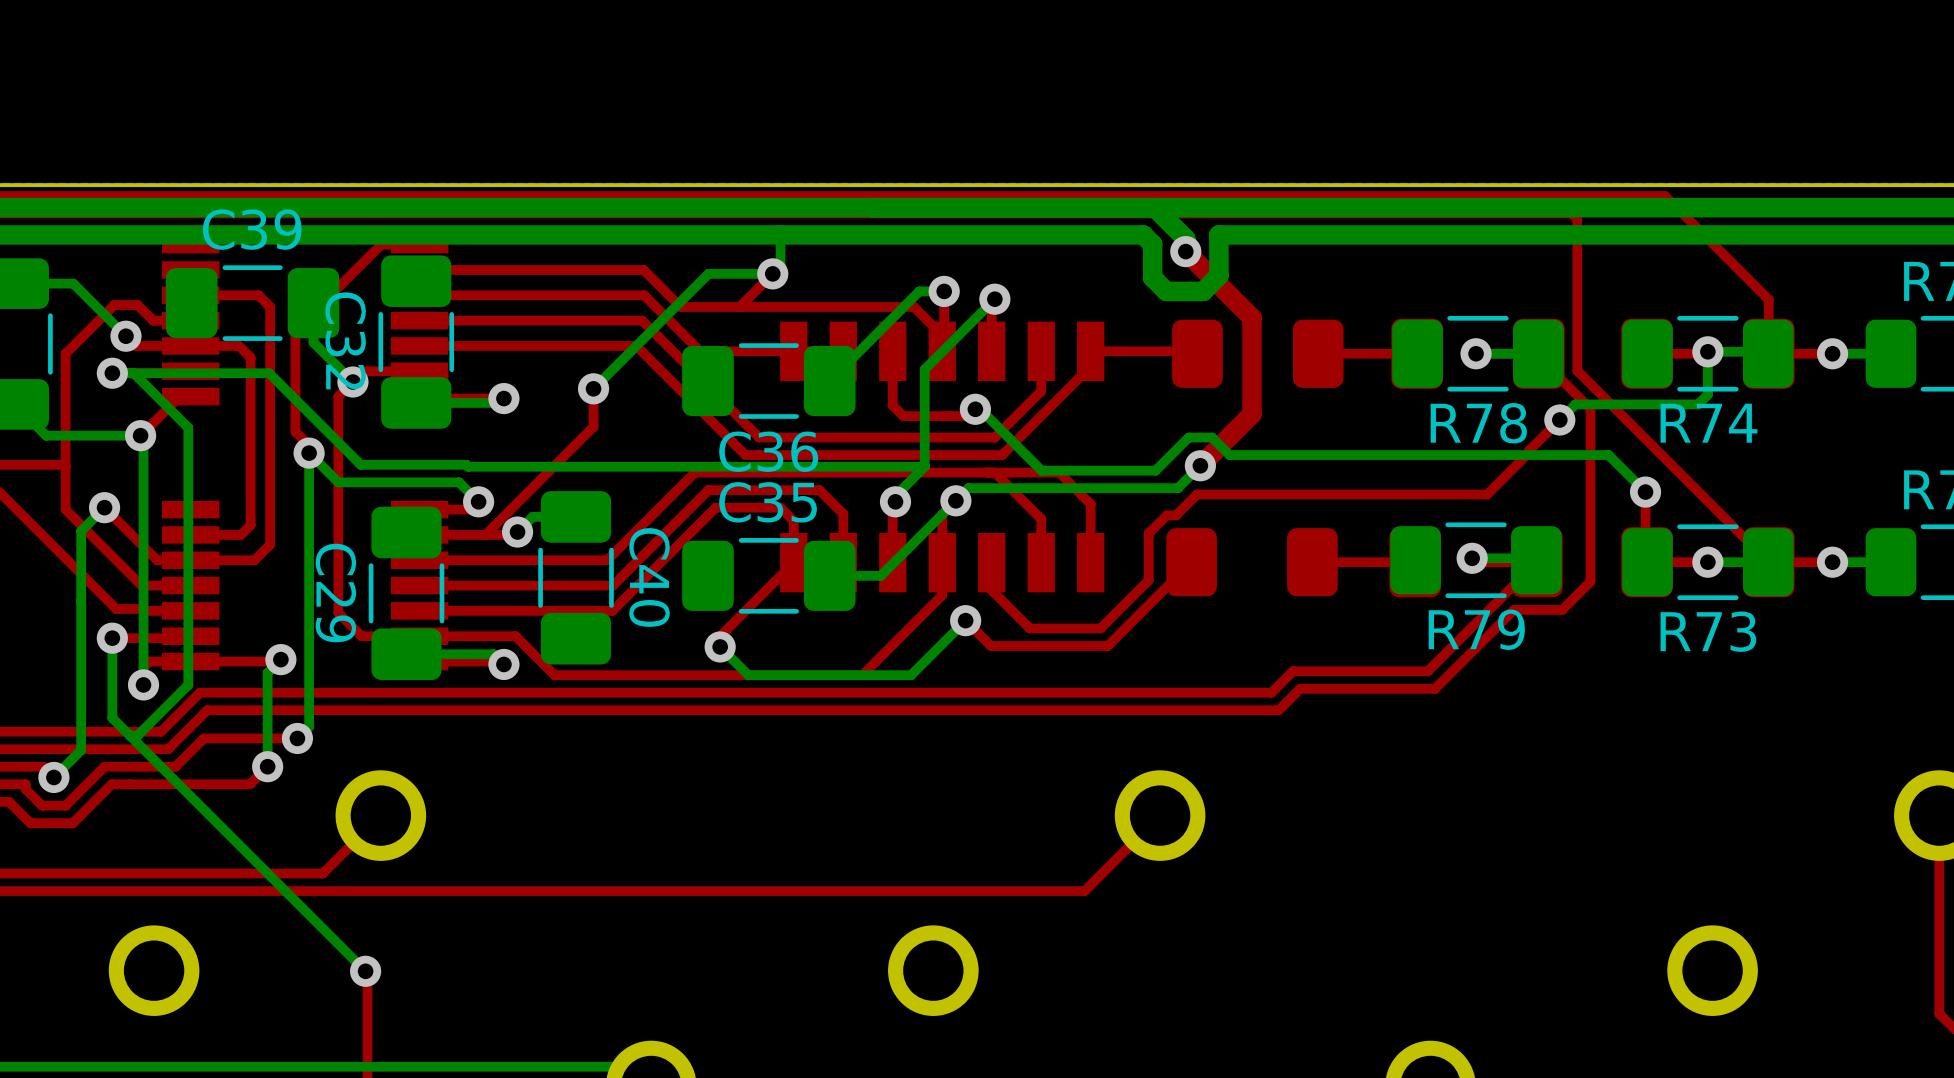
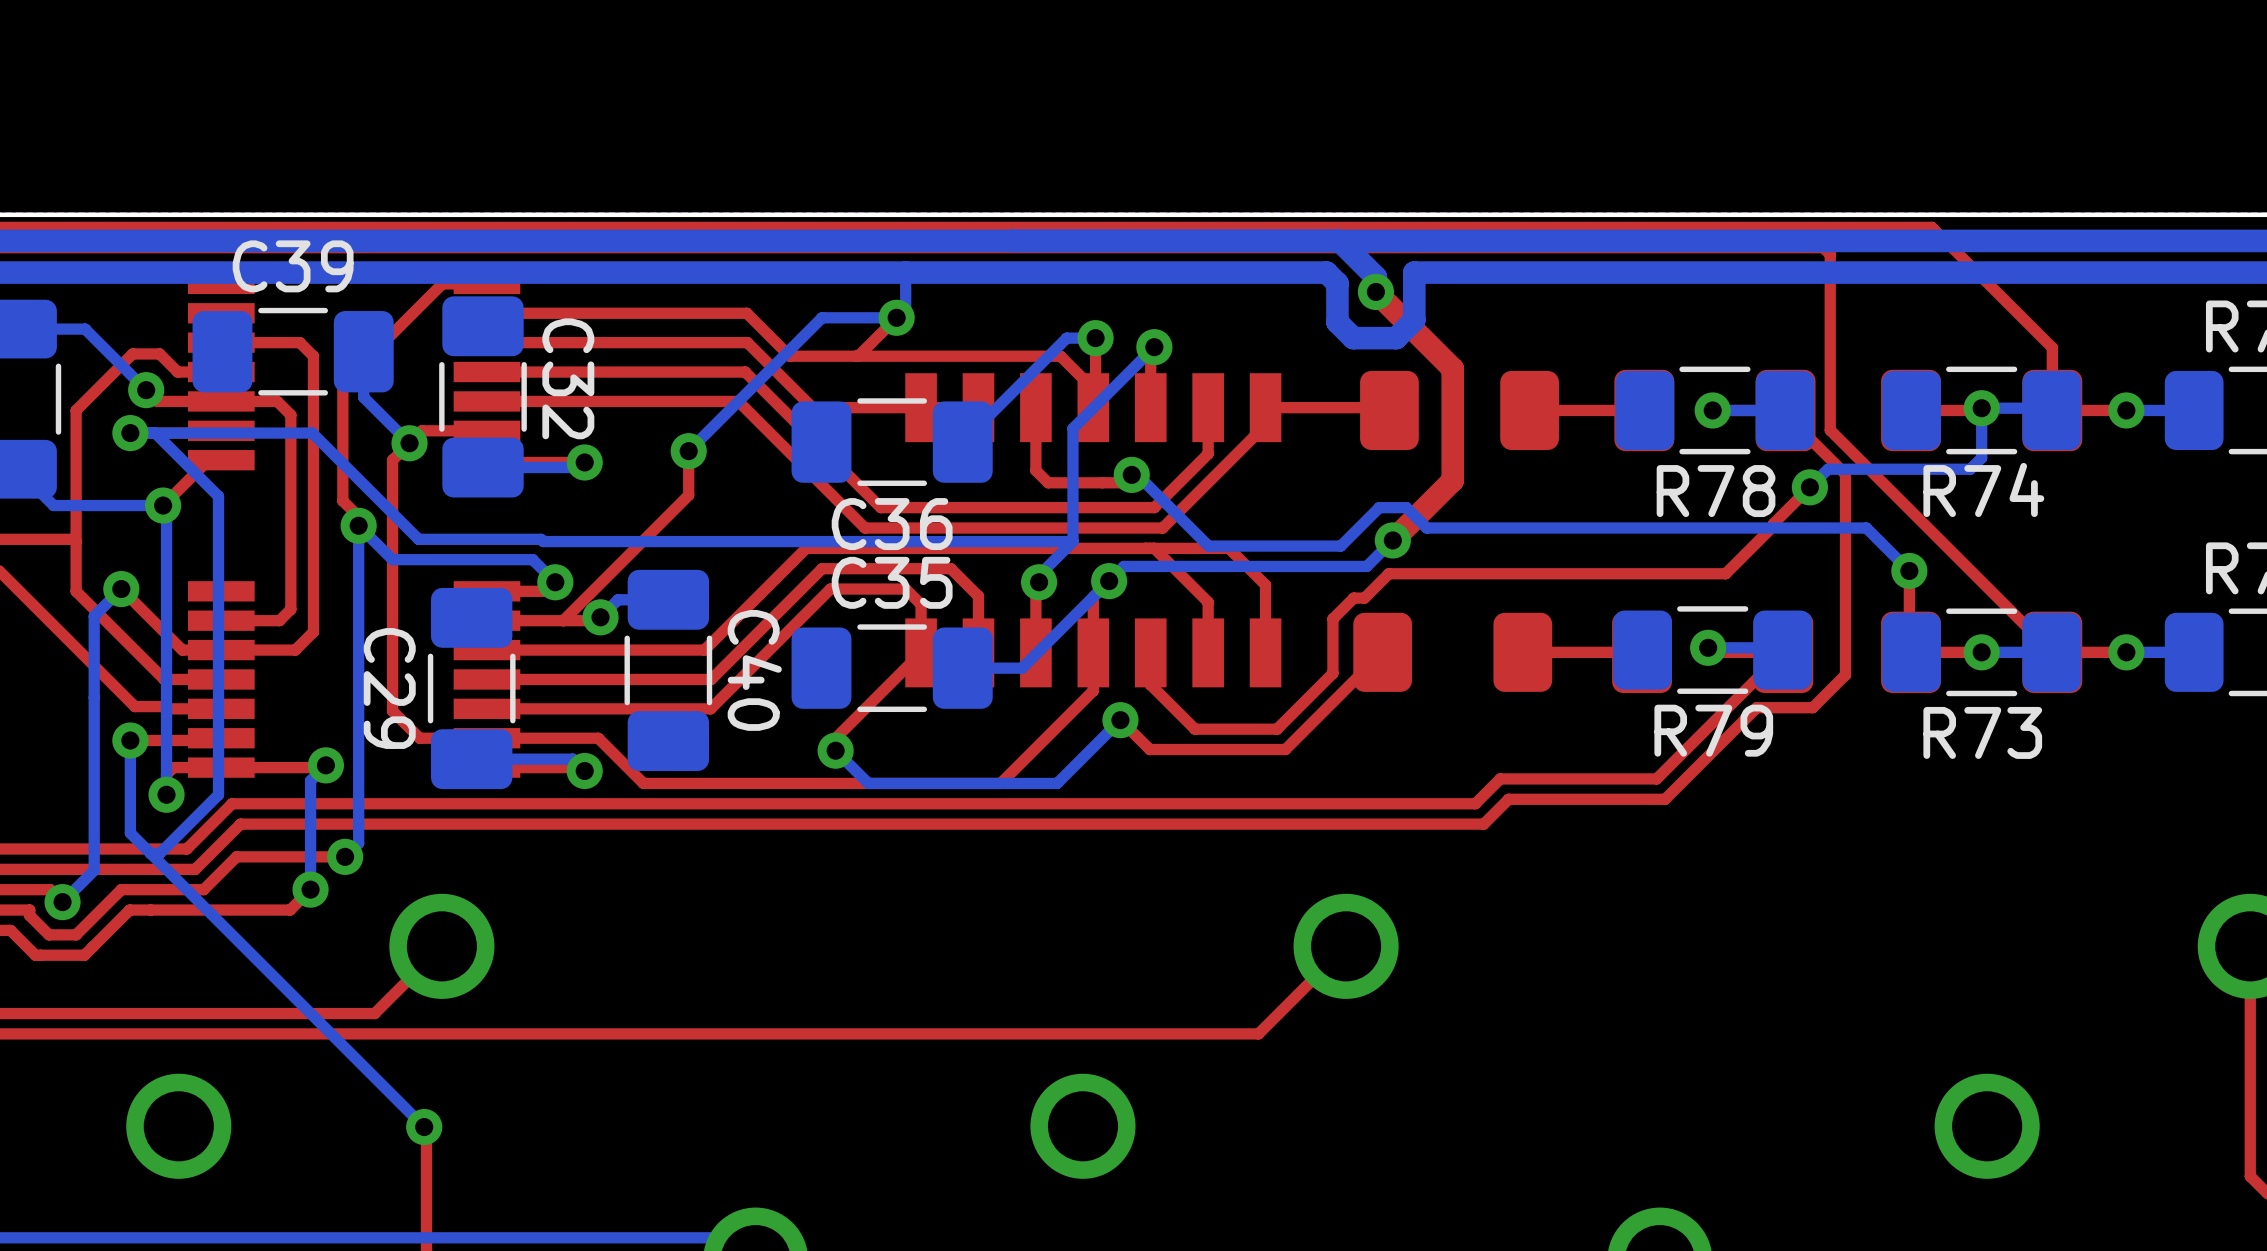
C32 name position: C32 (345, 340) -> C32 (568, 378)

